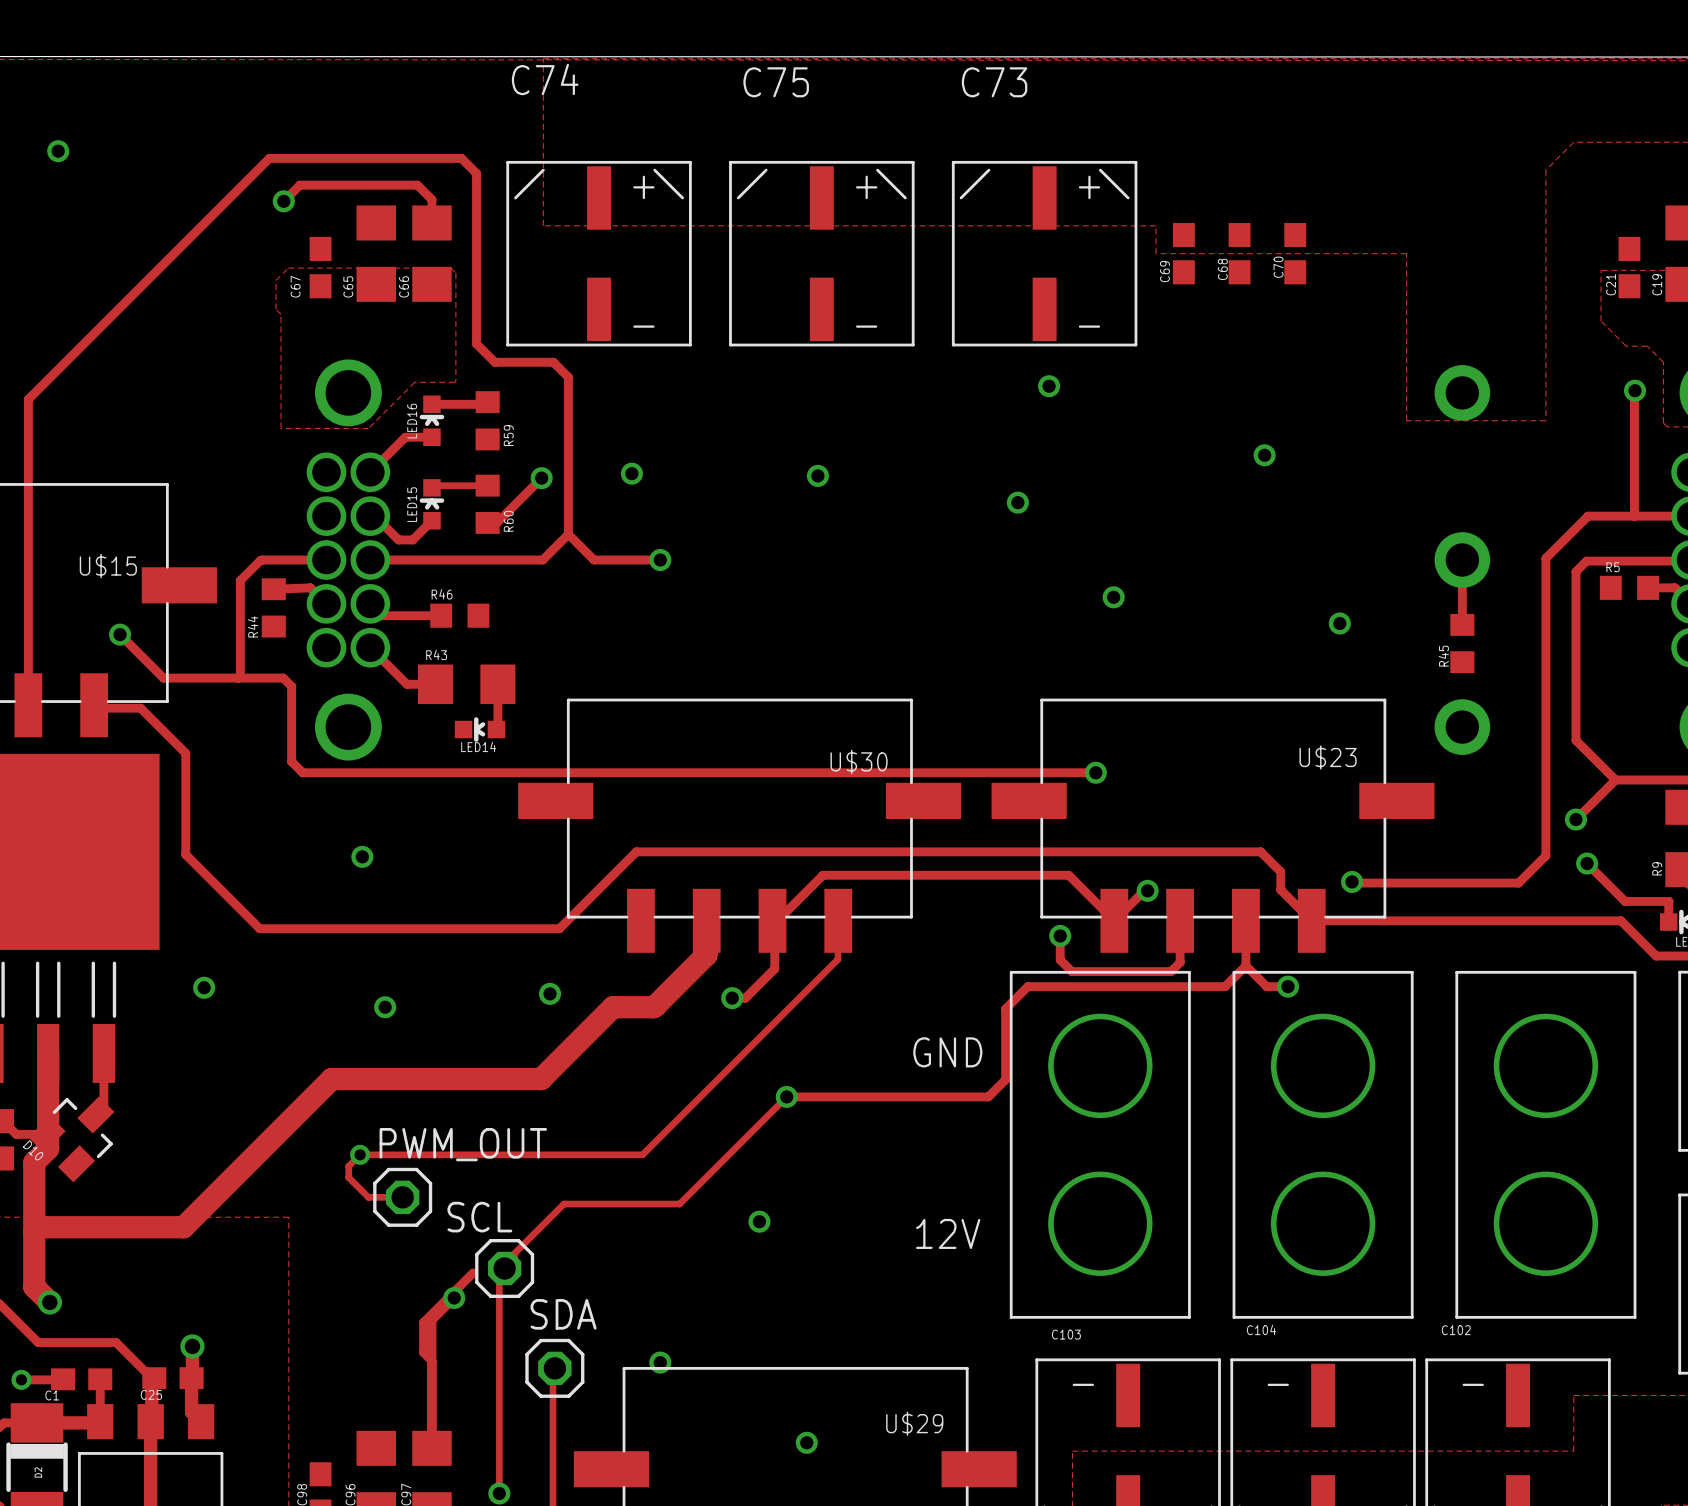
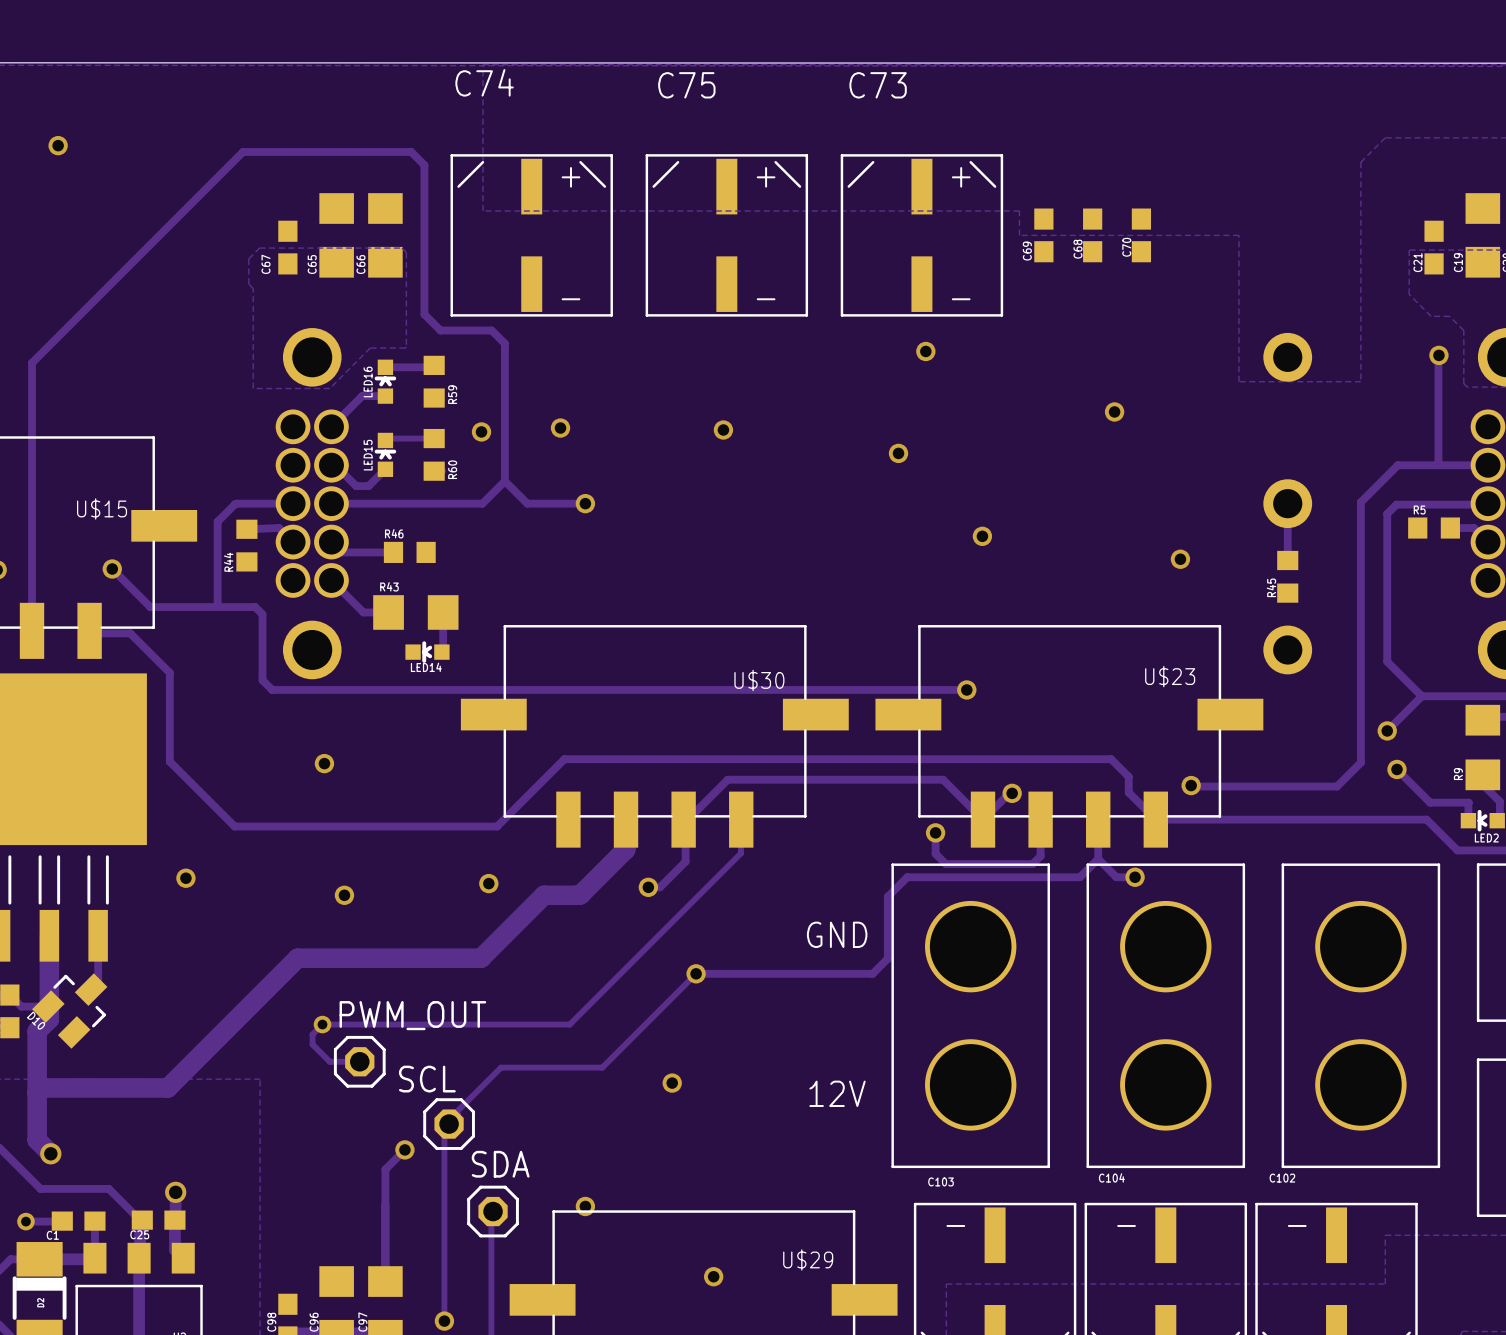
track: (283, 201) (299, 185) (417, 185) (431, 199) (431, 222) -> none
via: (283, 201) -> none
track: (541, 478) (496, 522) -> none
track: (473, 1272) (423, 1322) (423, 1352) (431, 1360) -> none

